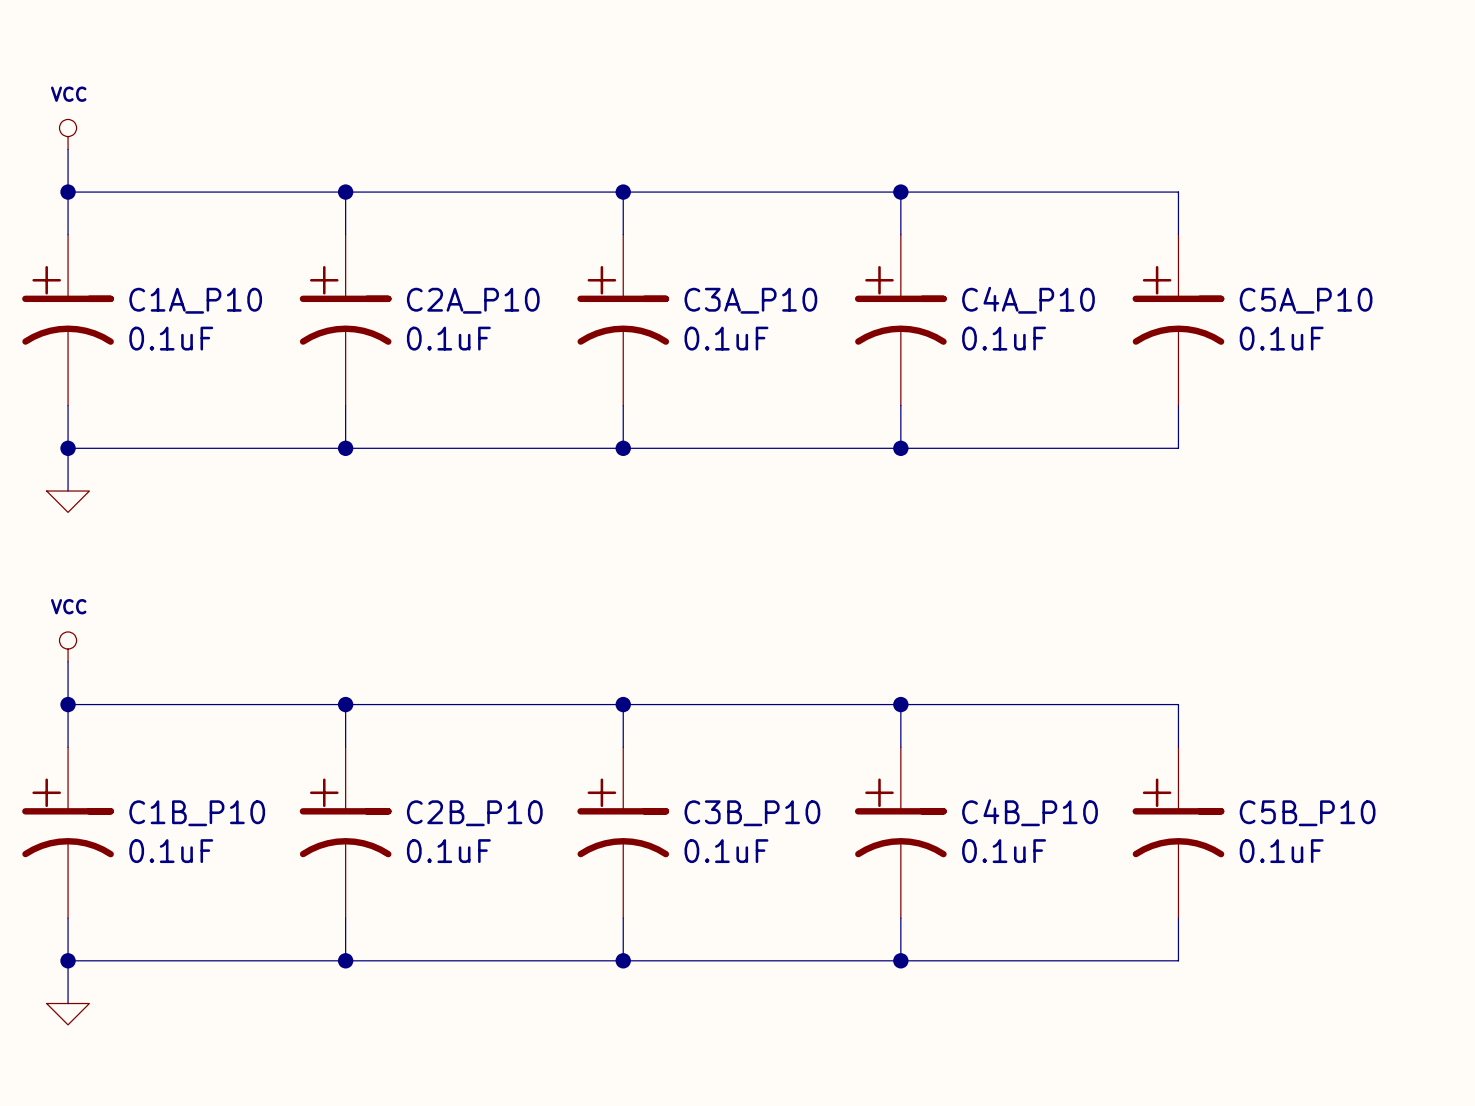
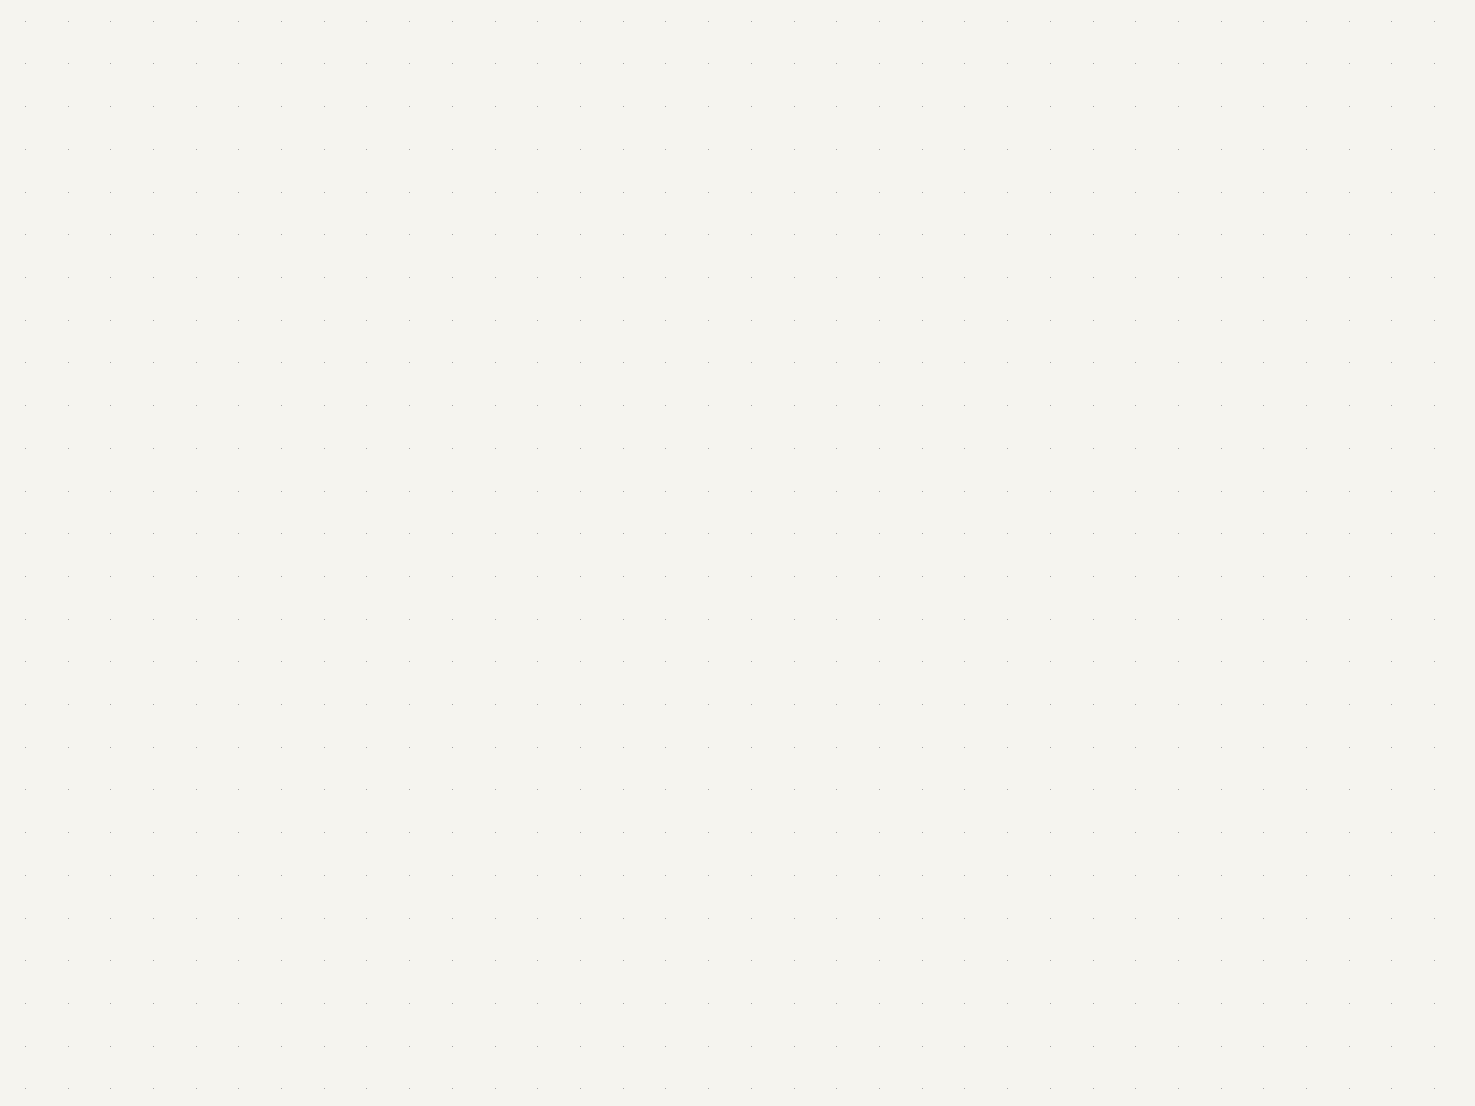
power symbol: VCC (68, 134) -> none
wire: (68, 149) (68, 234) -> none
wire: (68, 192) (1178, 192) (1178, 234) -> none
junction: (68, 192) -> none
wire: (345, 192) (345, 234) -> none
junction: (345, 192) -> none
wire: (623, 192) (623, 234) -> none
junction: (623, 192) -> none
wire: (900, 192) (900, 234) -> none
junction: (900, 192) -> none
C1A_P10: 0.1uF (68, 320) -> none
C2A_P10: 0.1uF (345, 320) -> none
C3A_P10: 0.1uF (623, 320) -> none
C4A_P10: 0.1uF (900, 320) -> none
C5A_P10: 0.1uF (1178, 320) -> none
wire: (68, 405) (68, 491) -> none
wire: (345, 405) (345, 448) -> none
wire: (623, 405) (623, 448) -> none
wire: (900, 405) (900, 448) -> none
wire: (1178, 405) (1178, 448) (68, 448) -> none
junction: (68, 448) -> none
junction: (345, 448) -> none
junction: (623, 448) -> none
junction: (900, 448) -> none
power symbol: (68, 501) -> none
power symbol: VCC (68, 646) -> none
wire: (68, 661) (68, 747) -> none
wire: (68, 704) (1178, 704) (1178, 747) -> none
junction: (68, 704) -> none
wire: (345, 704) (345, 747) -> none
junction: (345, 704) -> none
wire: (623, 704) (623, 747) -> none
junction: (623, 704) -> none
wire: (900, 704) (900, 747) -> none
junction: (900, 704) -> none
C1B_P10: 0.1uF (68, 832) -> none
C2B_P10: 0.1uF (345, 832) -> none
C3B_P10: 0.1uF (623, 832) -> none
C4B_P10: 0.1uF (900, 832) -> none
C5B_P10: 0.1uF (1178, 832) -> none
wire: (68, 918) (68, 1003) -> none
wire: (345, 918) (345, 960) -> none
wire: (623, 918) (623, 960) -> none
wire: (900, 918) (900, 960) -> none
wire: (1178, 918) (1178, 960) (68, 960) -> none
junction: (68, 960) -> none
junction: (345, 960) -> none
junction: (623, 960) -> none
junction: (900, 960) -> none
power symbol: (68, 1014) -> none

